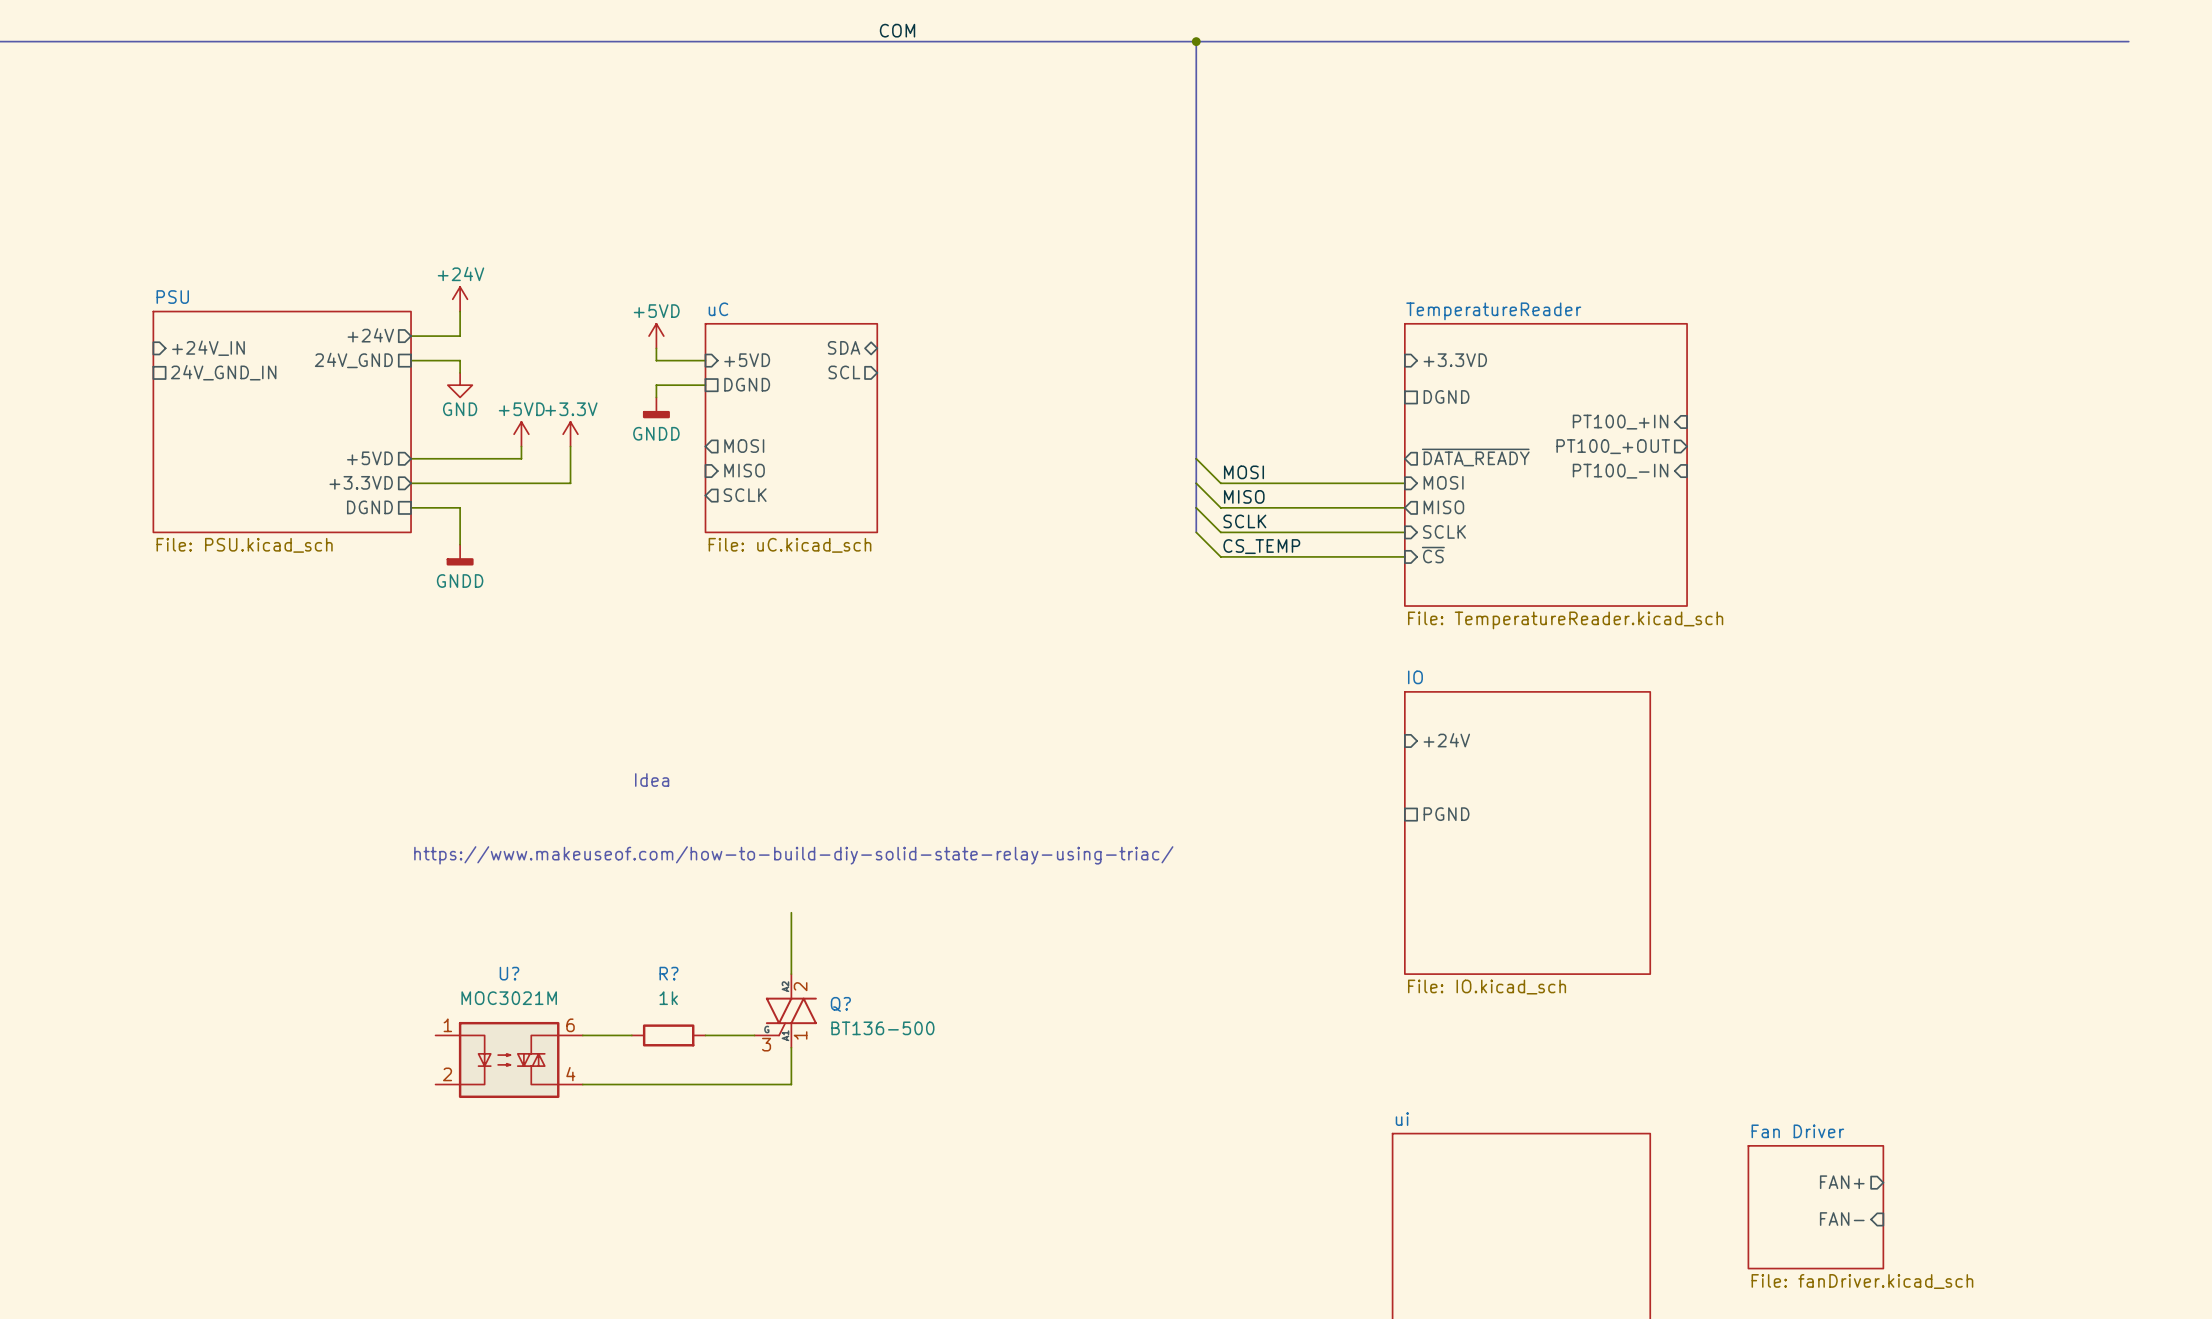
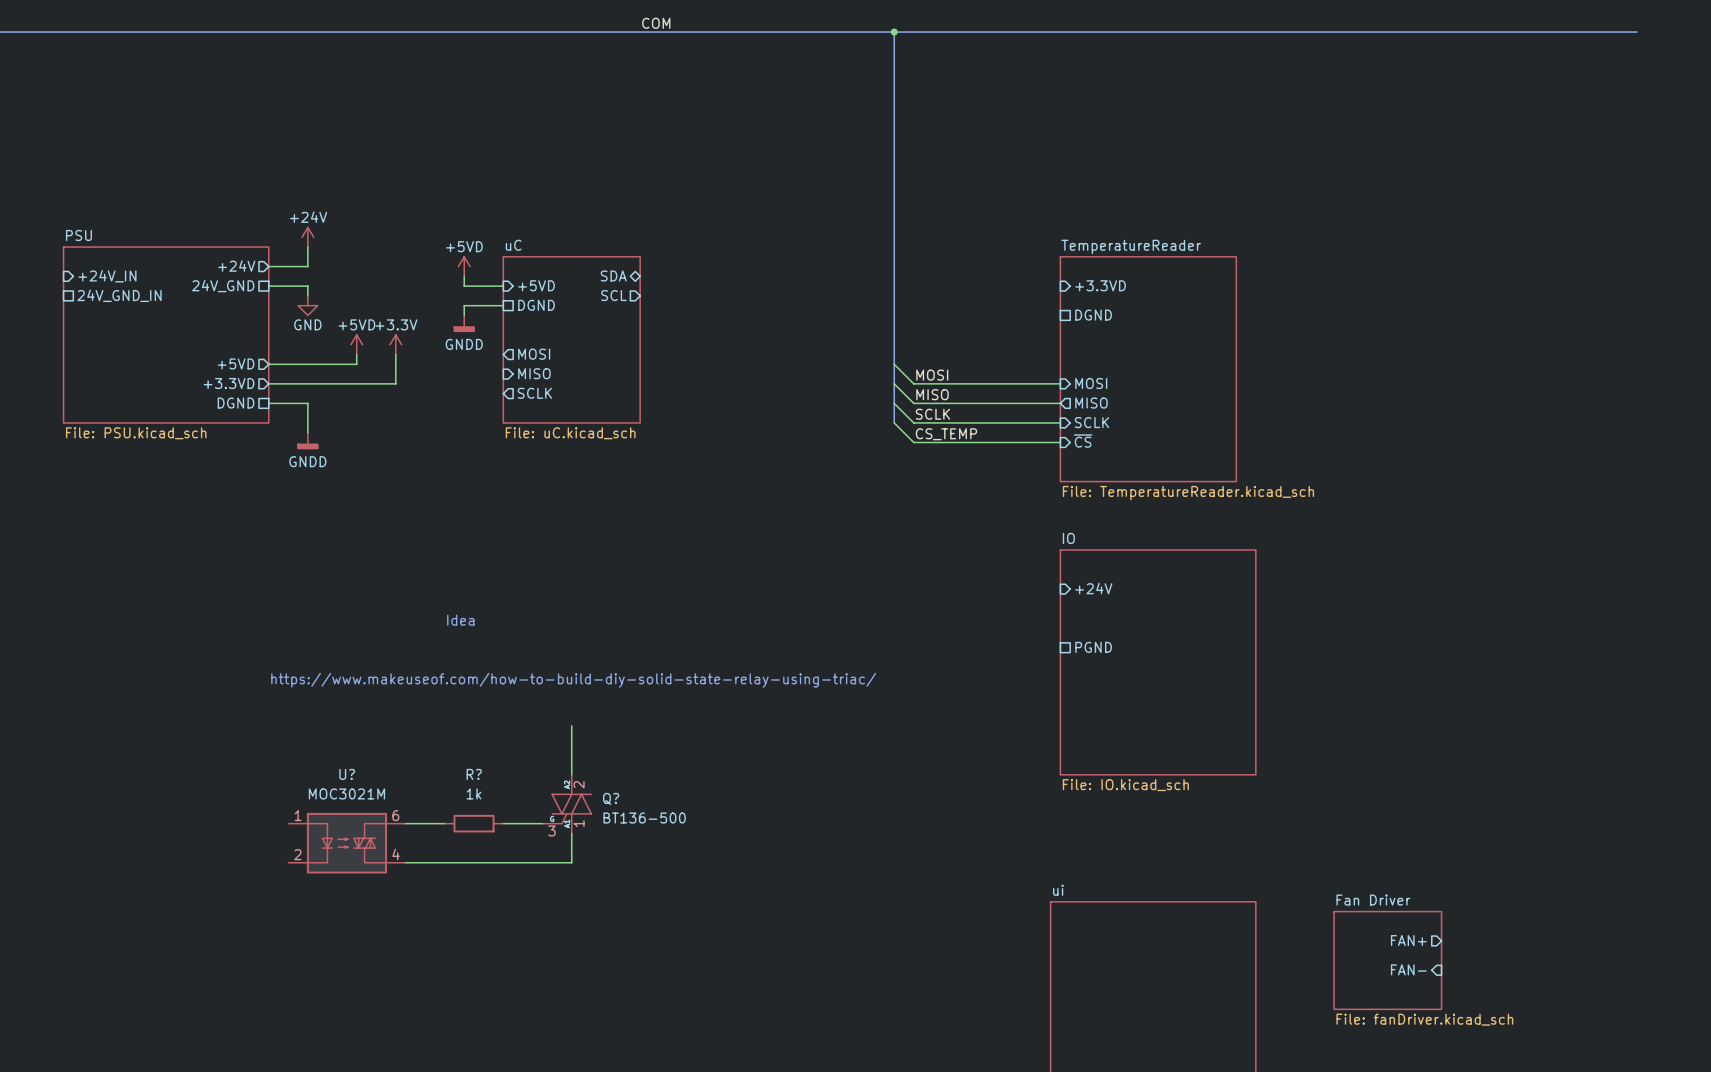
sheet pin: PT100_+IN (1620, 422) -> none
sheet pin: PT100_+OUT (1613, 446) -> none
sheet pin: ~{DATA_READY} (1475, 457) -> none
sheet TemperatureReader: none -> File: TemperatureReader.kicad_sch (1148, 369)
sheet TemperatureReader: File: TemperatureReader.kicad_sch (1545, 464) -> none
sheet pin: PT100_-IN (1620, 471) -> none

